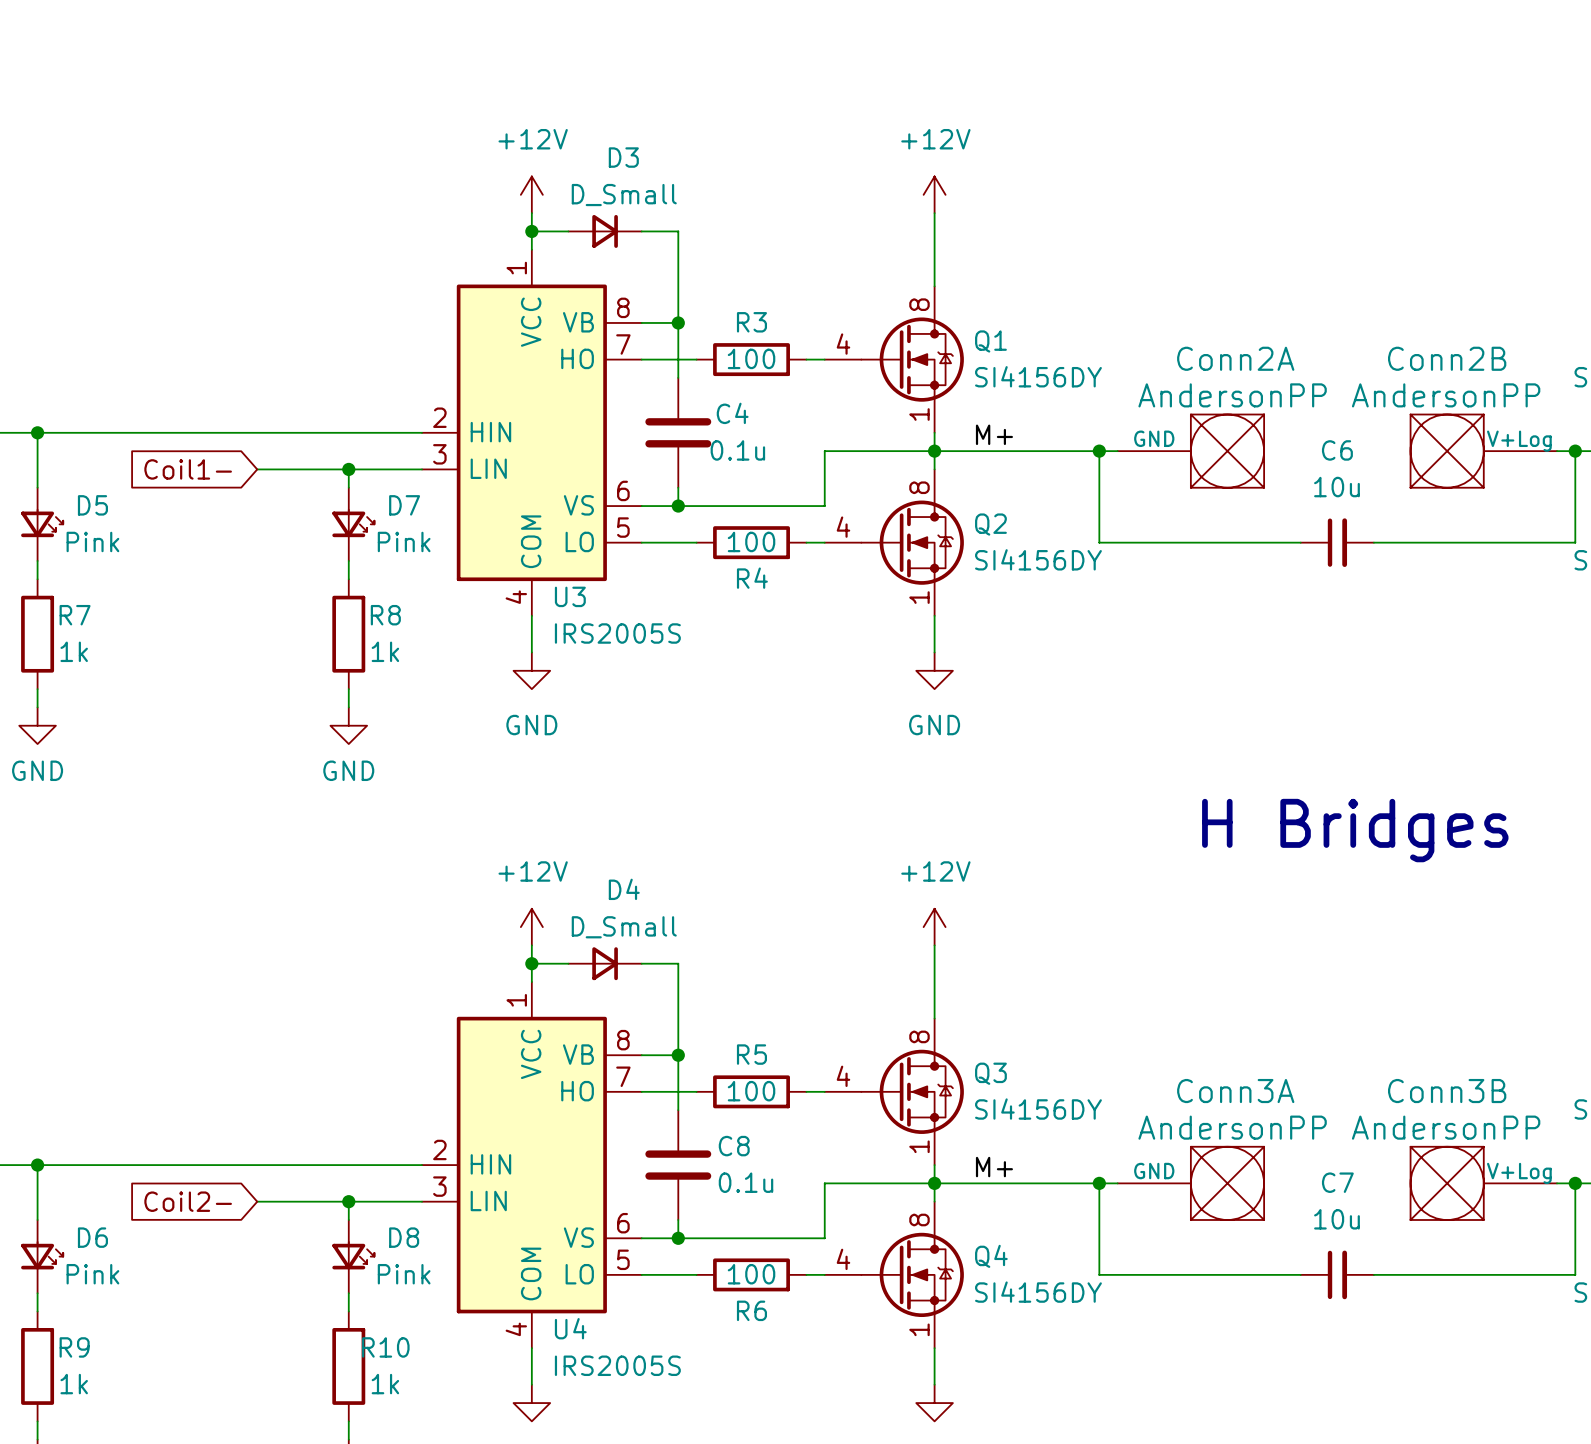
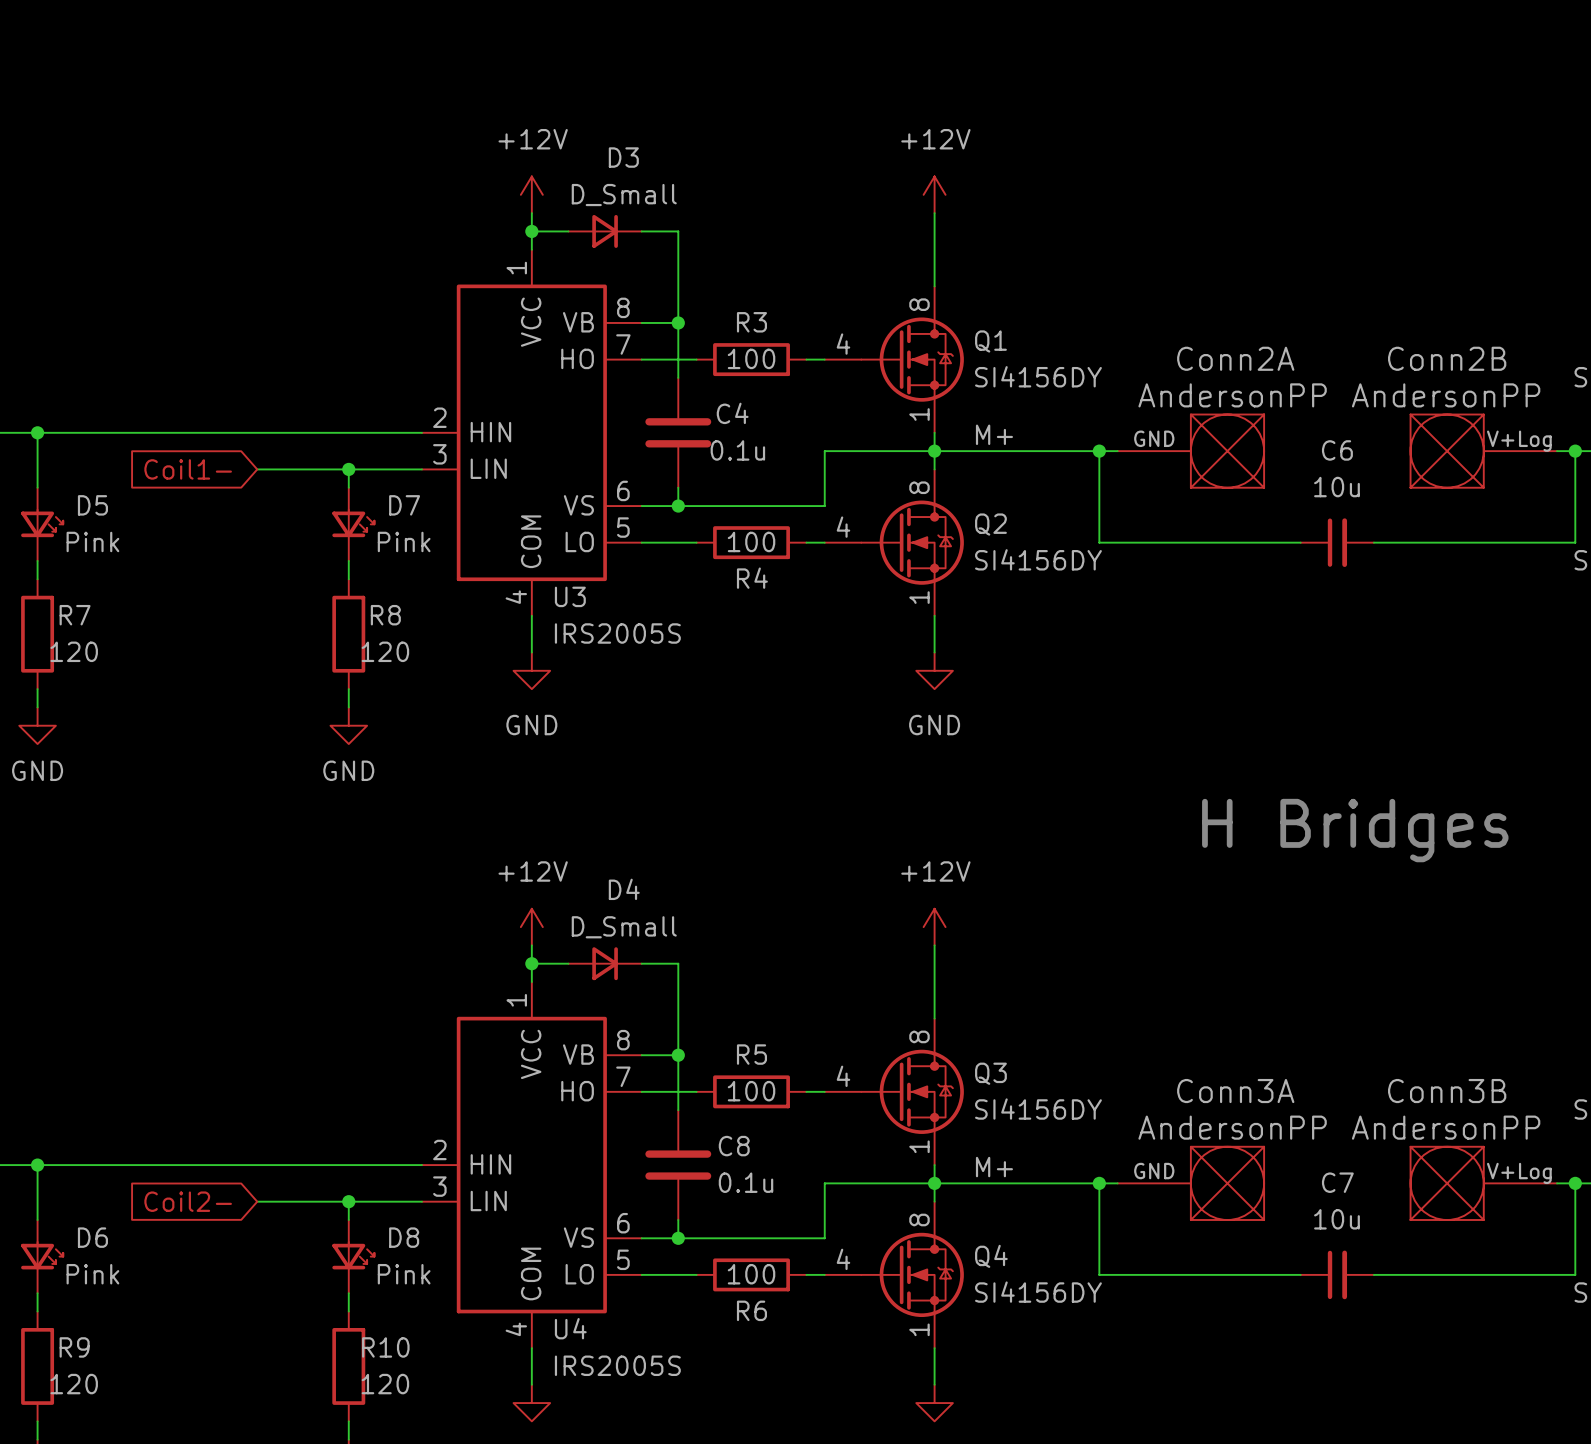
R7 value: 1k (74, 651) -> 120 (74, 651)
R8 value: 1k (385, 651) -> 120 (385, 651)
R9 value: 1k (74, 1384) -> 120 (74, 1384)
R10 value: 1k (385, 1384) -> 120 (385, 1384)

